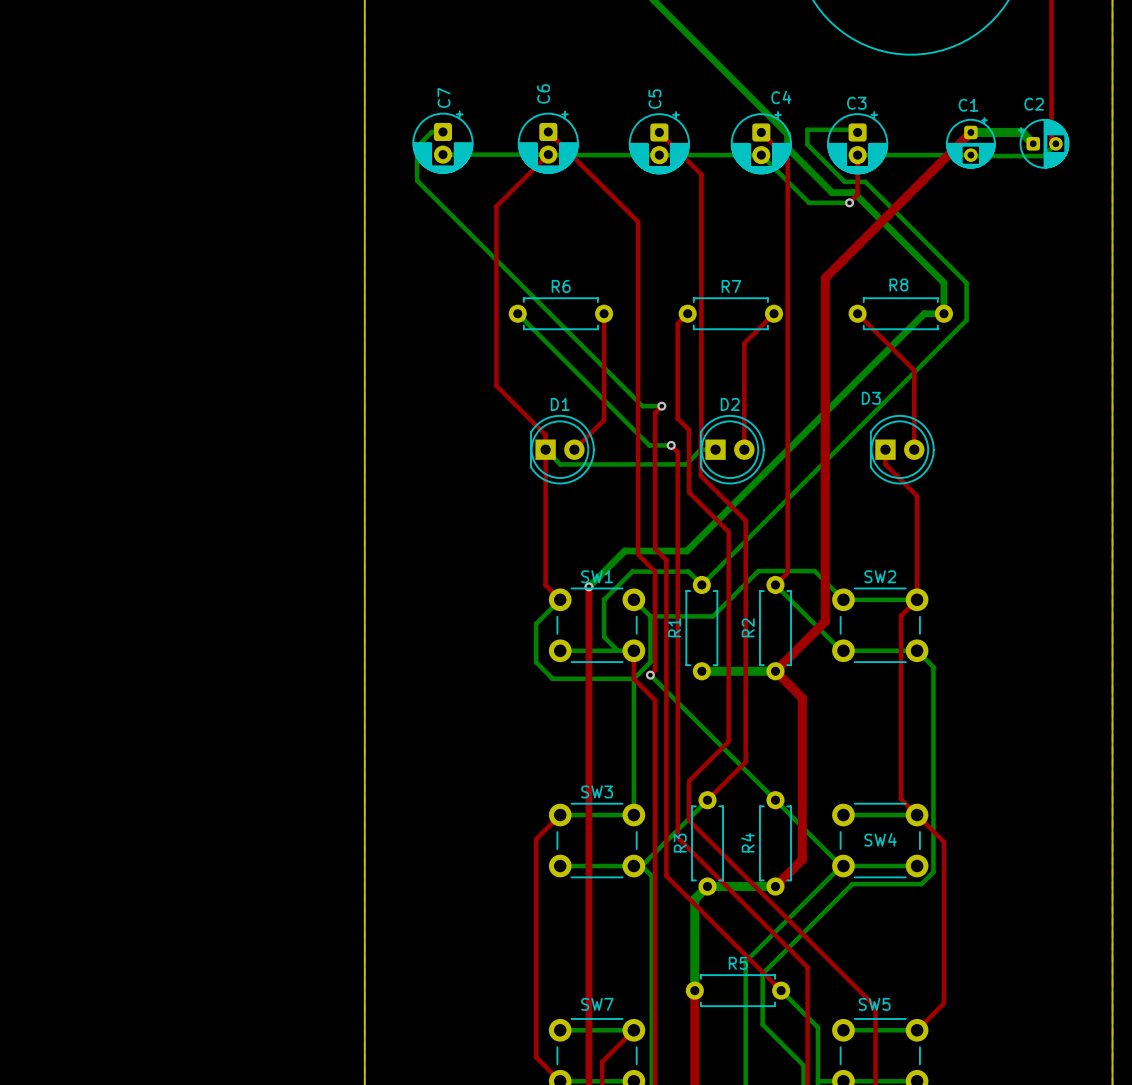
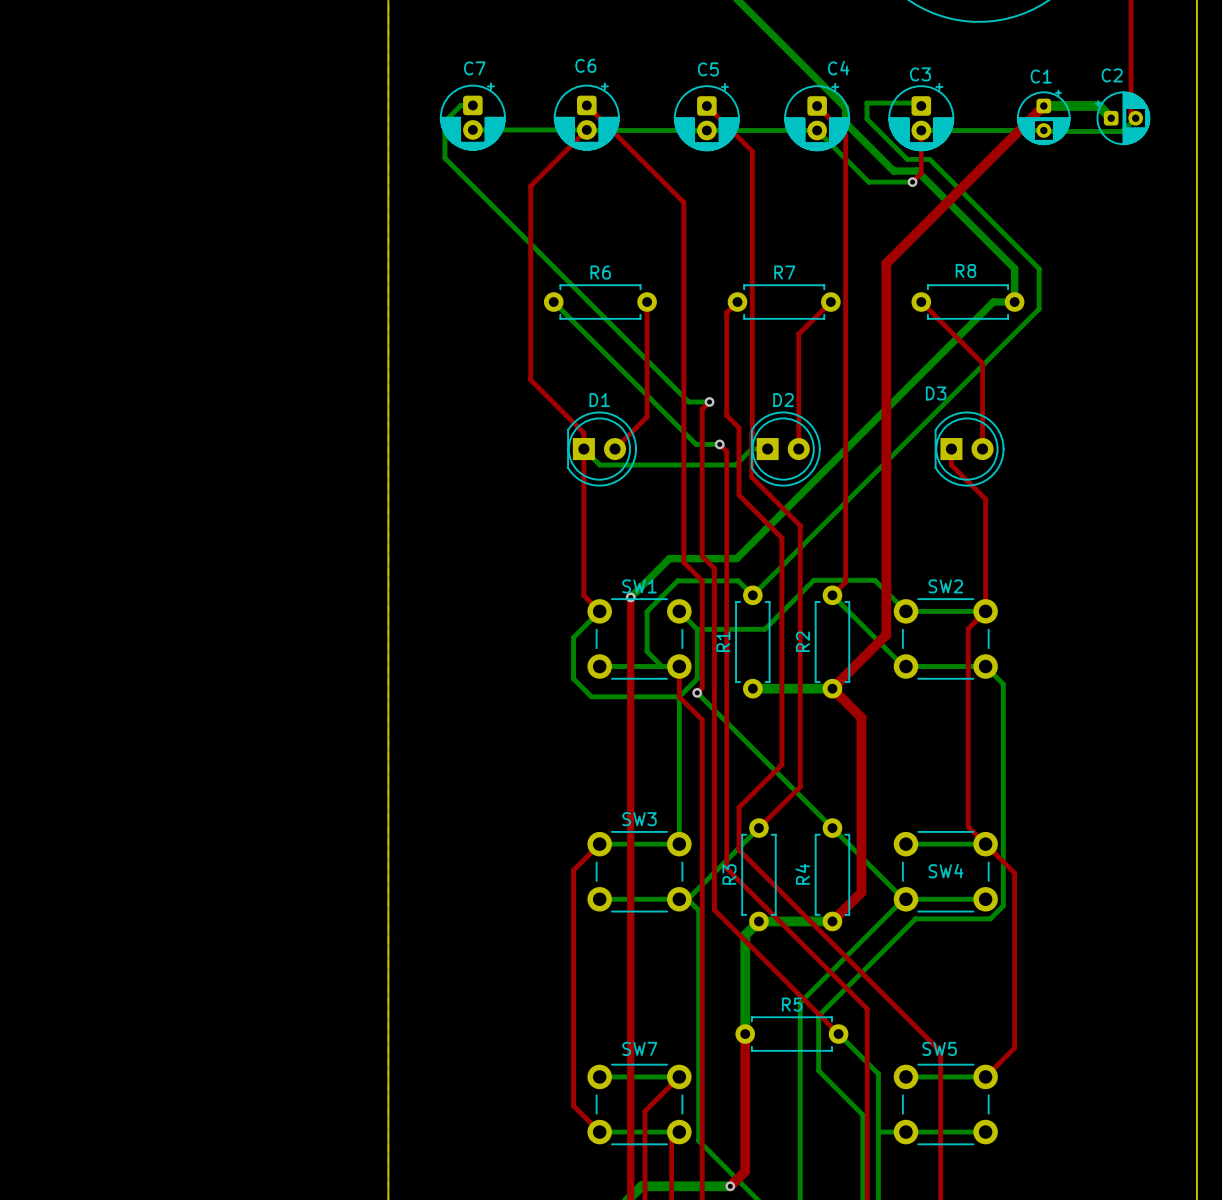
C6 name rotation: 0° (543, 93) -> 90° clockwise (585, 65)
C7 name rotation: 0° (444, 97) -> 90° clockwise (474, 68)
C5 name rotation: 0° (654, 99) -> 90° clockwise (708, 69)

